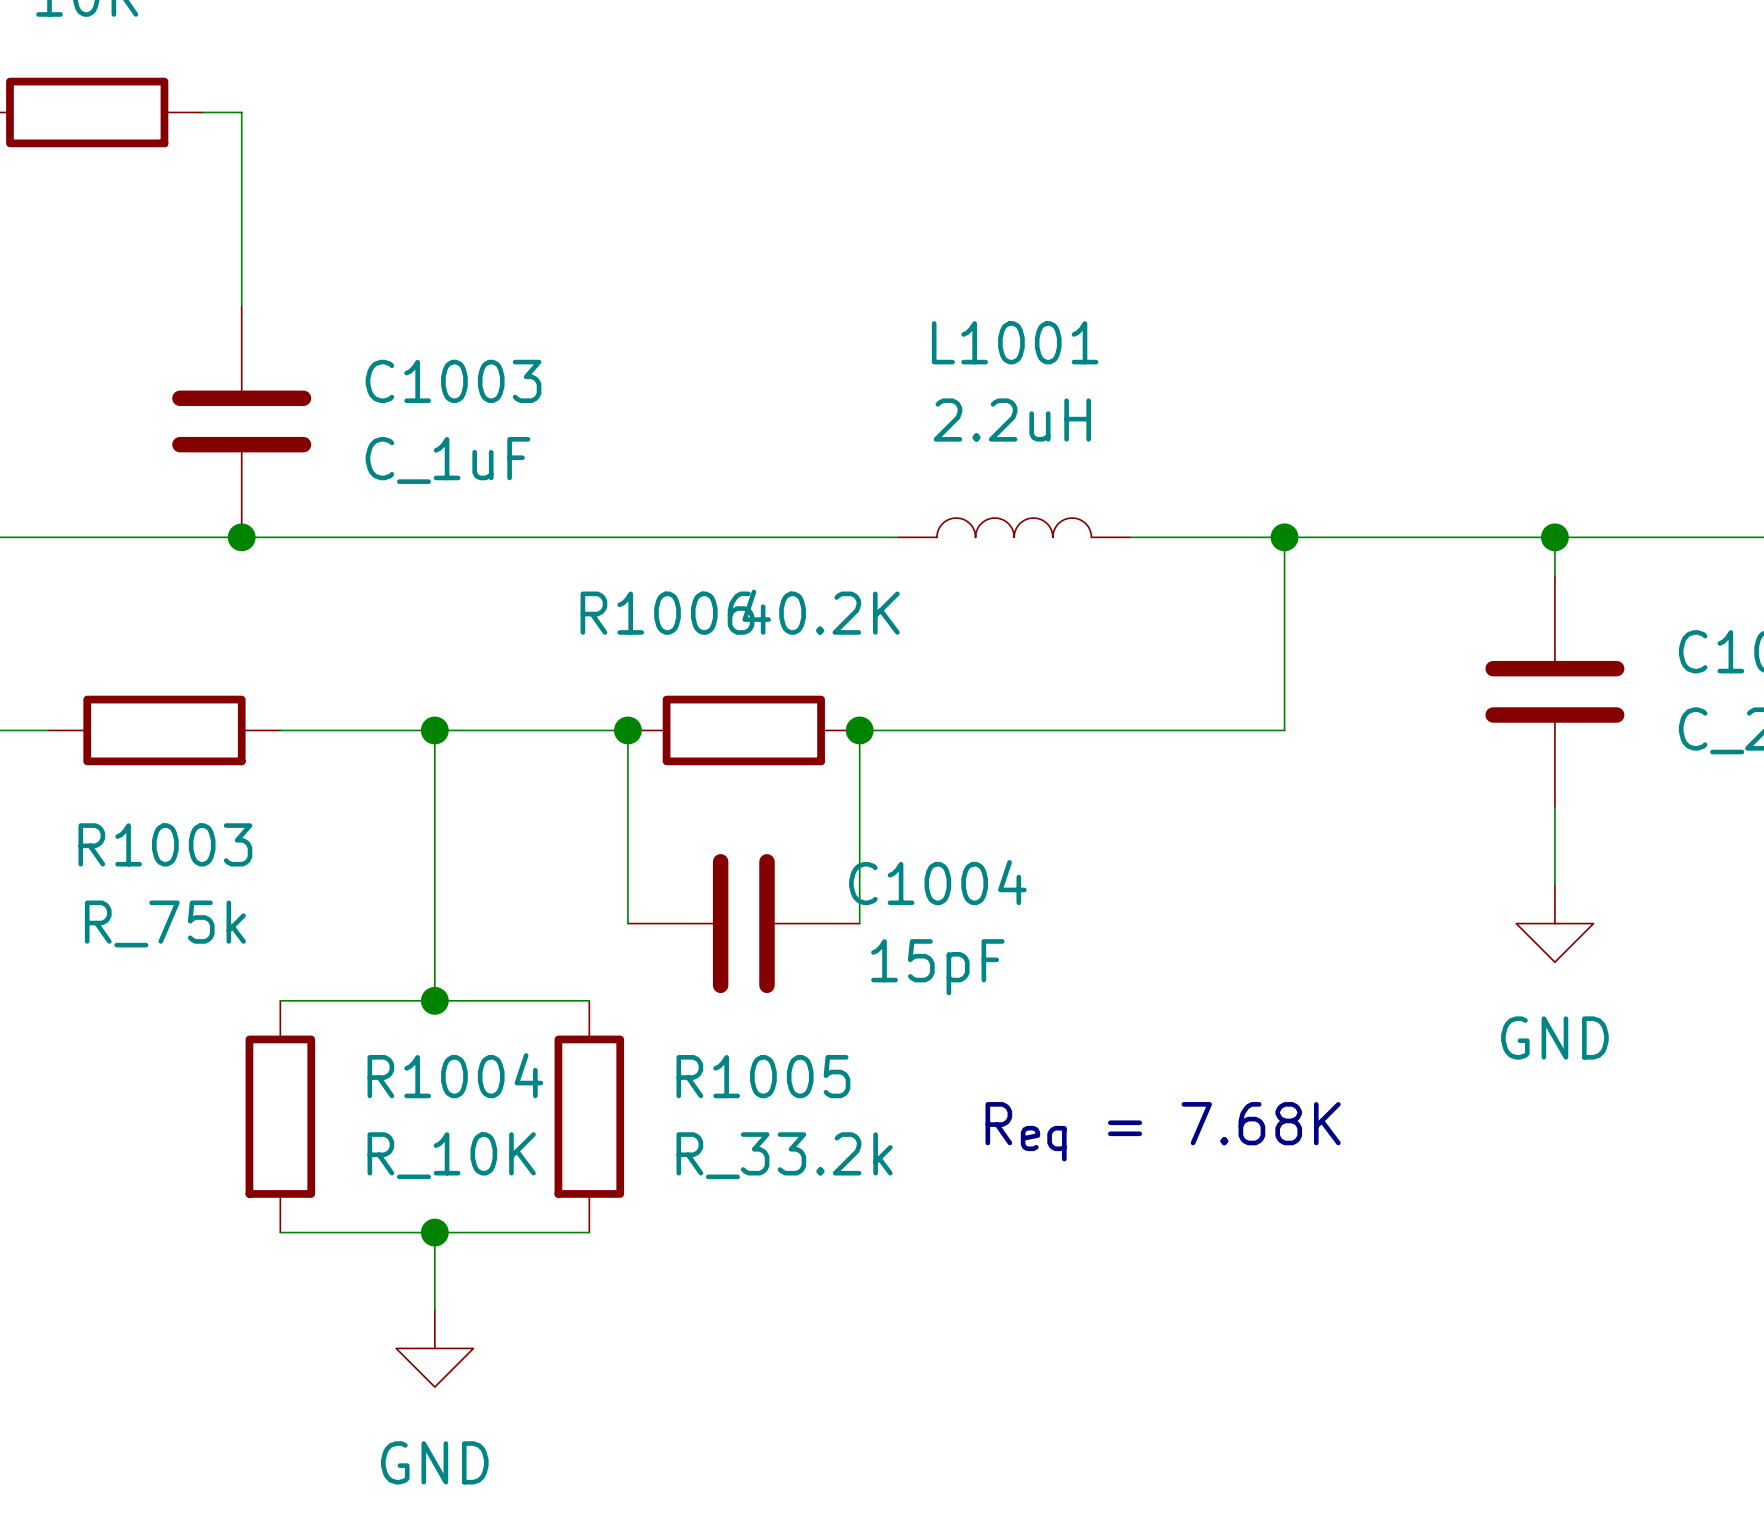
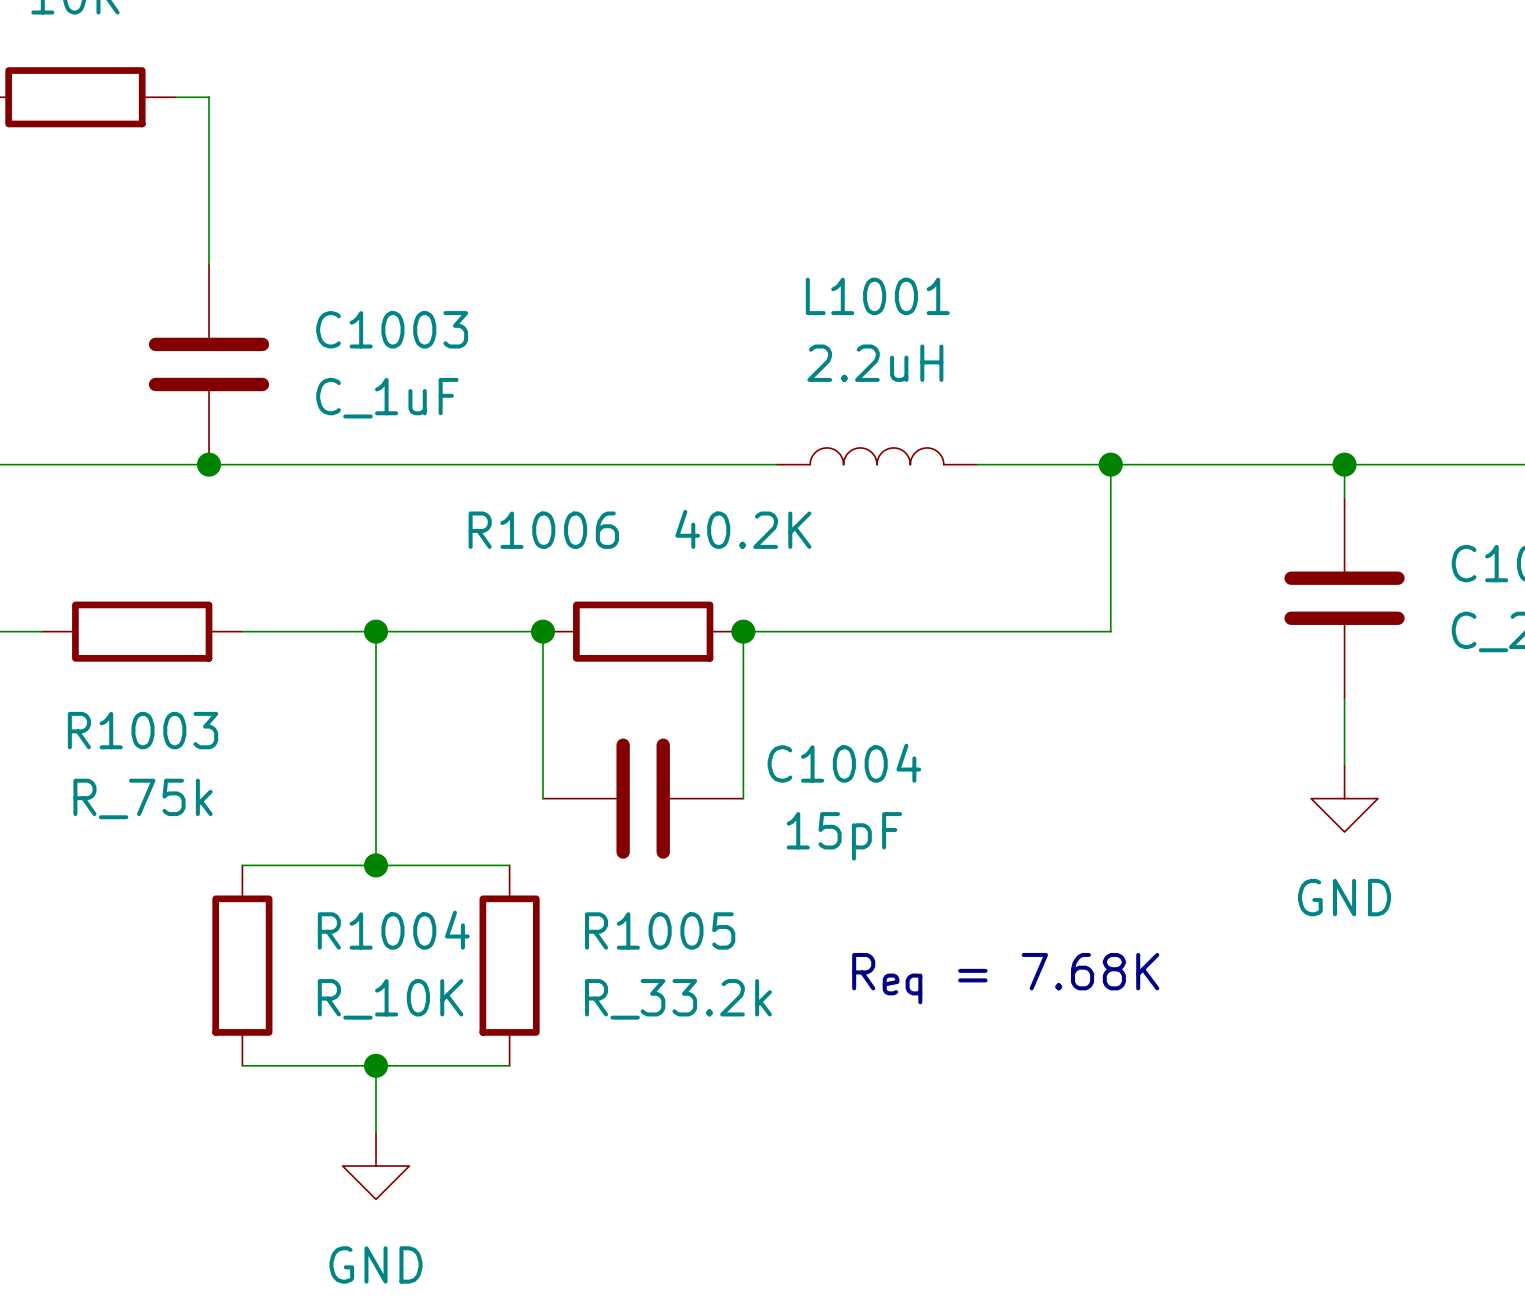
R1006 value position: 40.2K (821, 612) -> 40.2K (743, 529)
R1006 name position: R1006 (667, 613) -> R1006 (543, 530)
C1004 name position: C1004 (937, 882) -> C1004 (844, 763)
C1004 value position: 15pF (937, 967) -> 15pF (844, 836)

